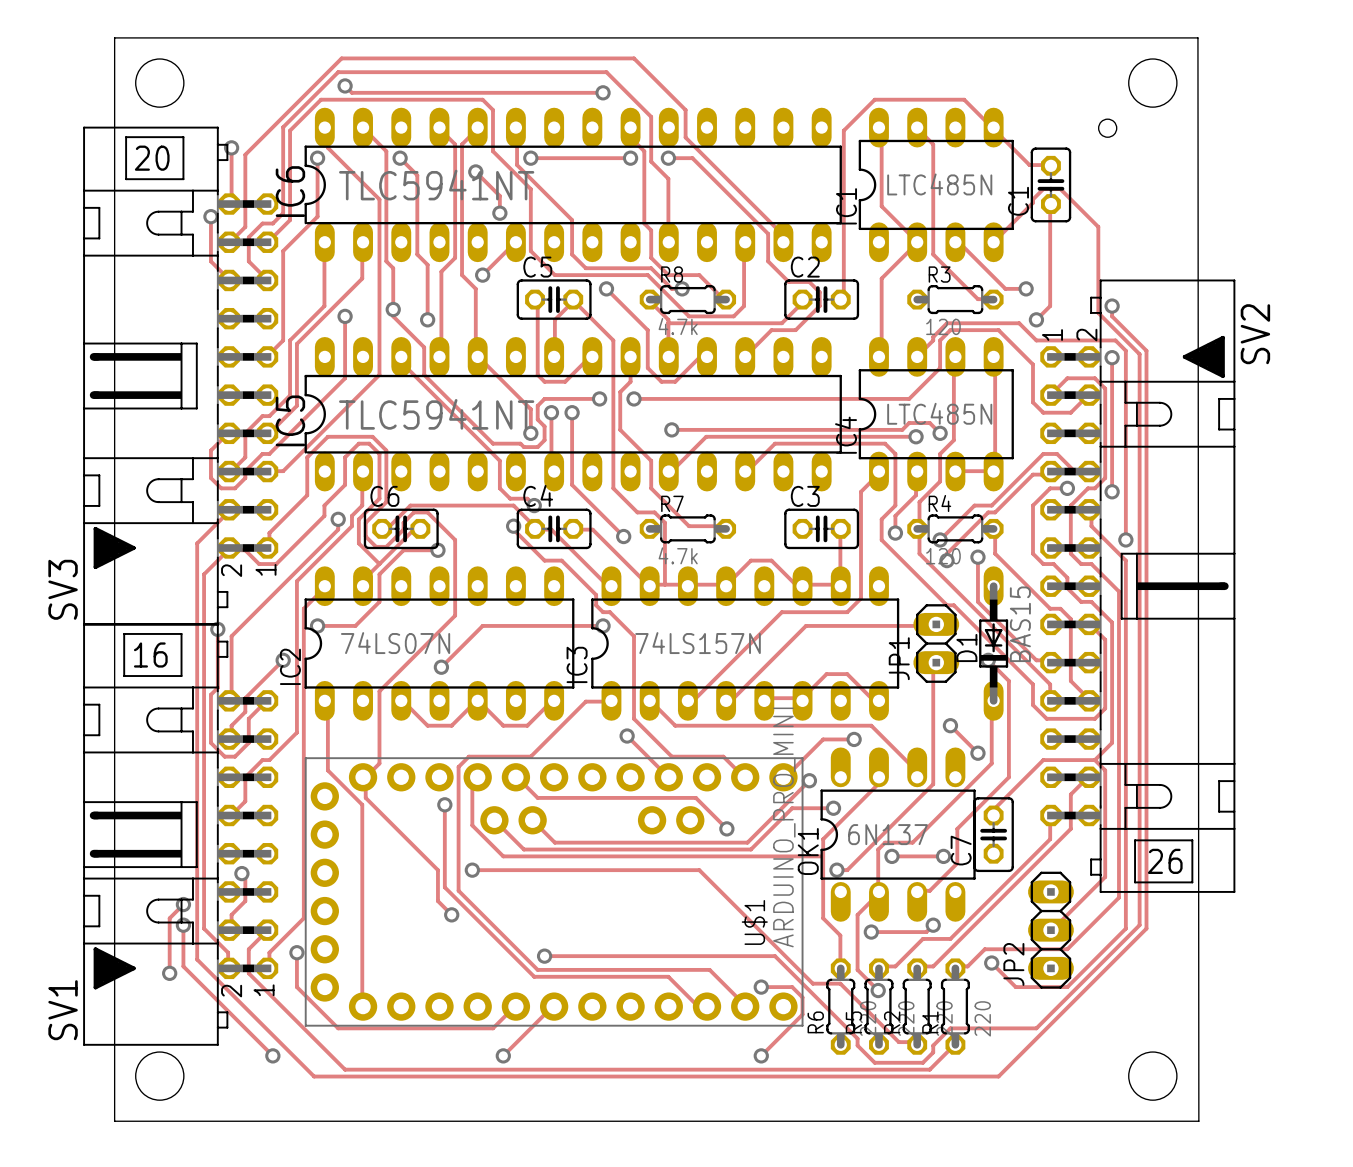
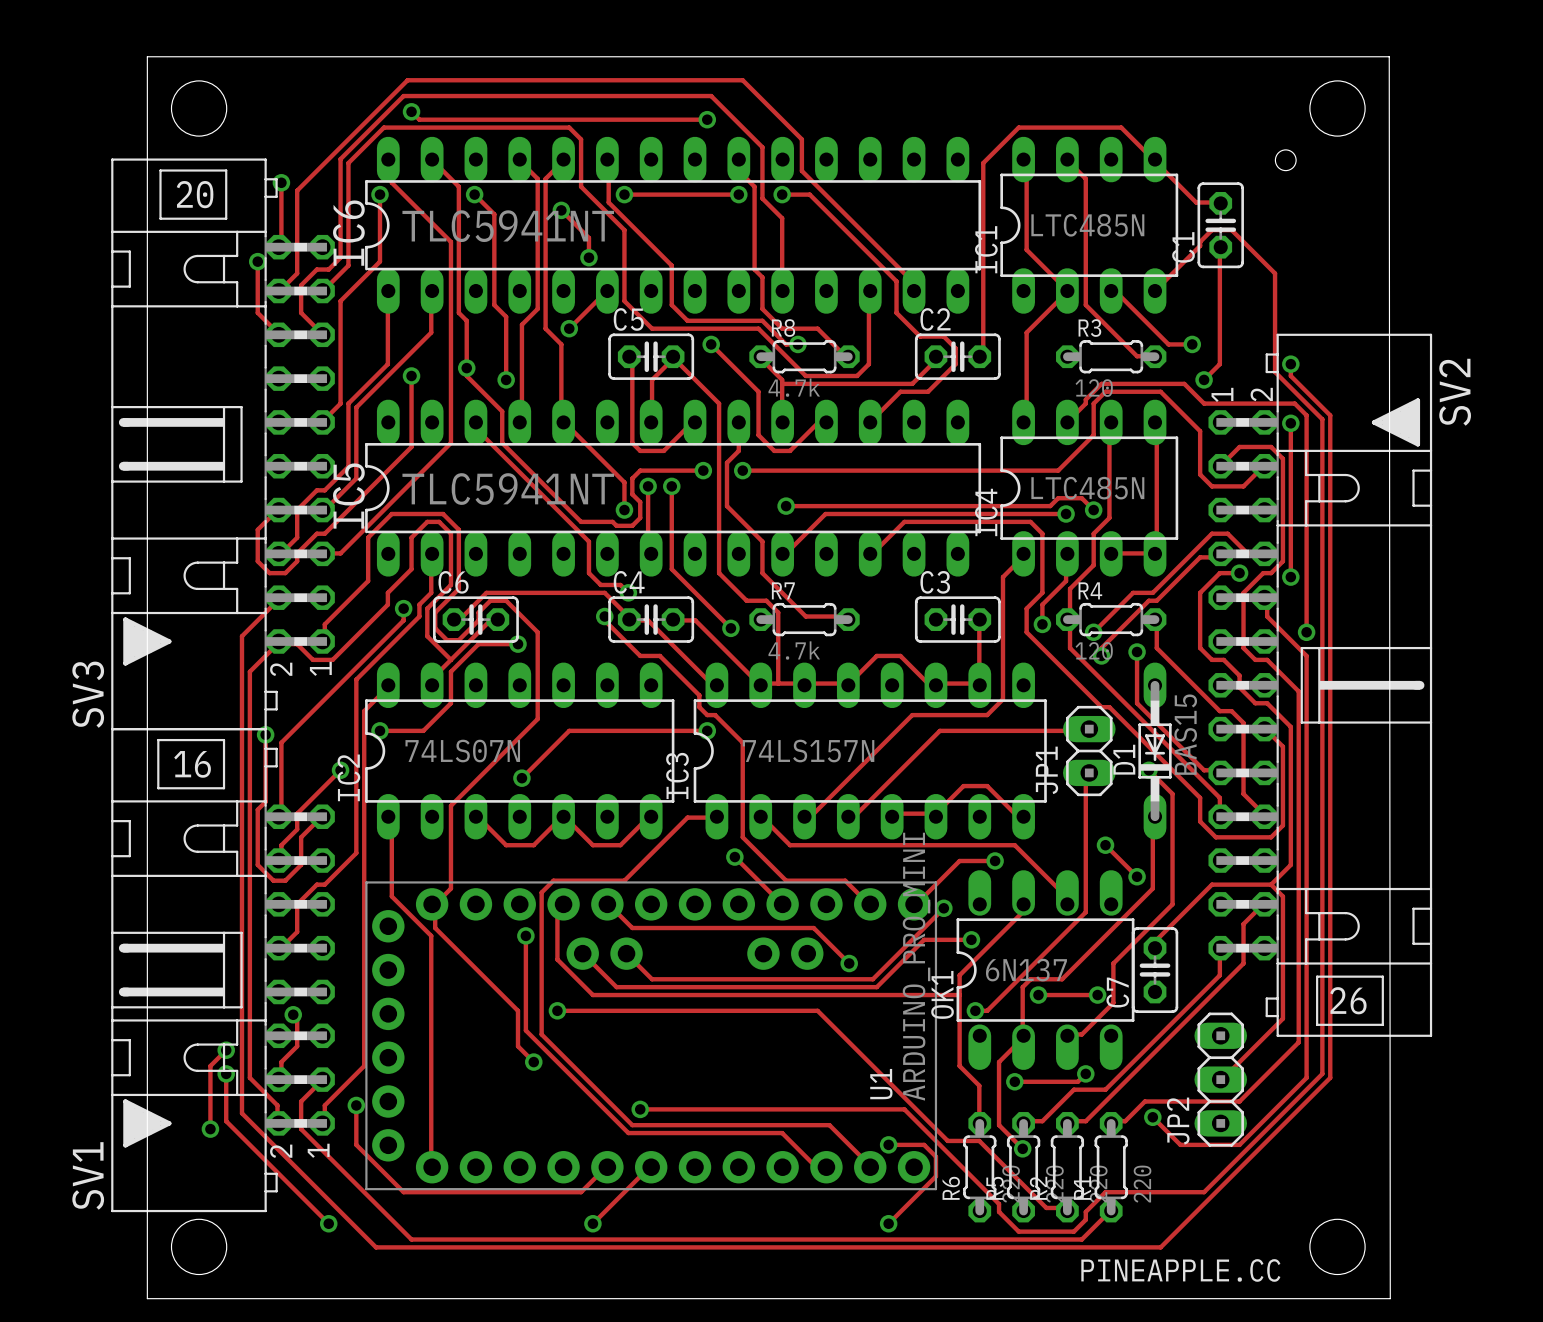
U$1 name: U$1 (754, 922) -> U1 (881, 1084)
text: none -> PINEAPPLE.CC (1180, 1270)

